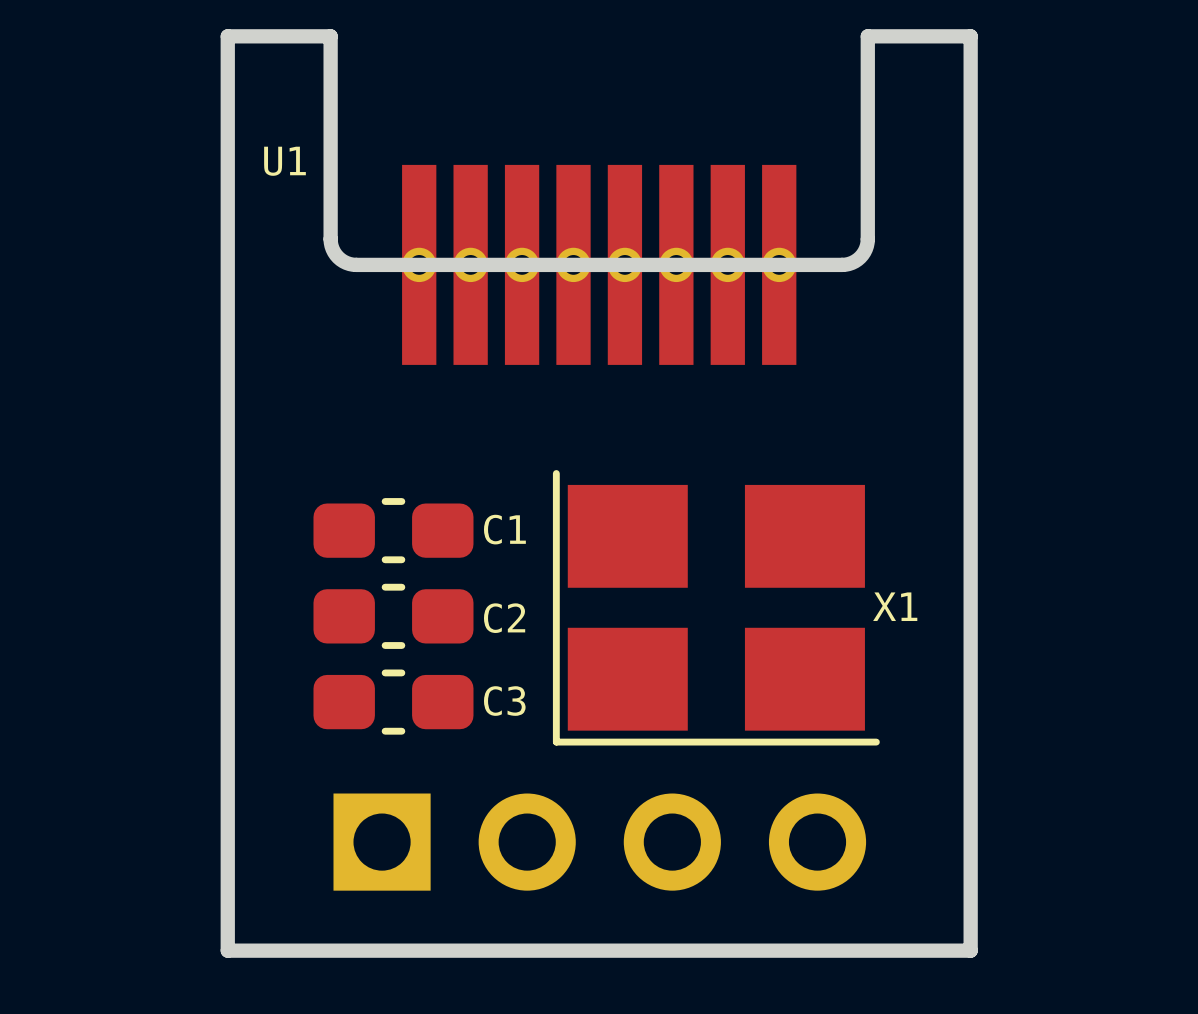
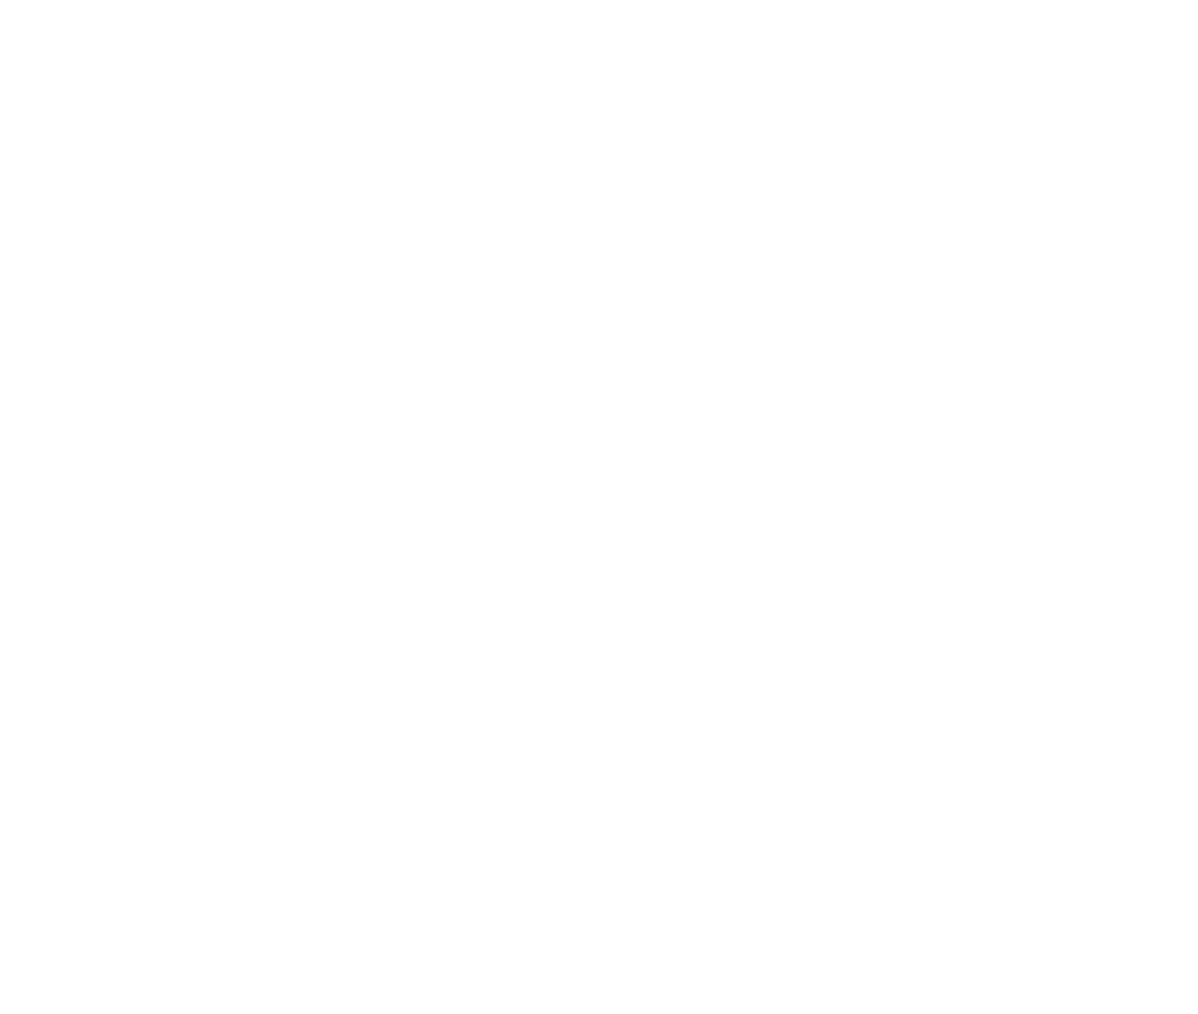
board edge: (330, 36) (227, 36) (227, 950) (970, 950) (970, 36) (867, 36) -> none
U1: (599, 197) -> none
C1: (393, 530) -> none
X1: (716, 607) -> none
C2: (393, 616) -> none
C3: (393, 702) -> none
part: (599, 842) -> none

